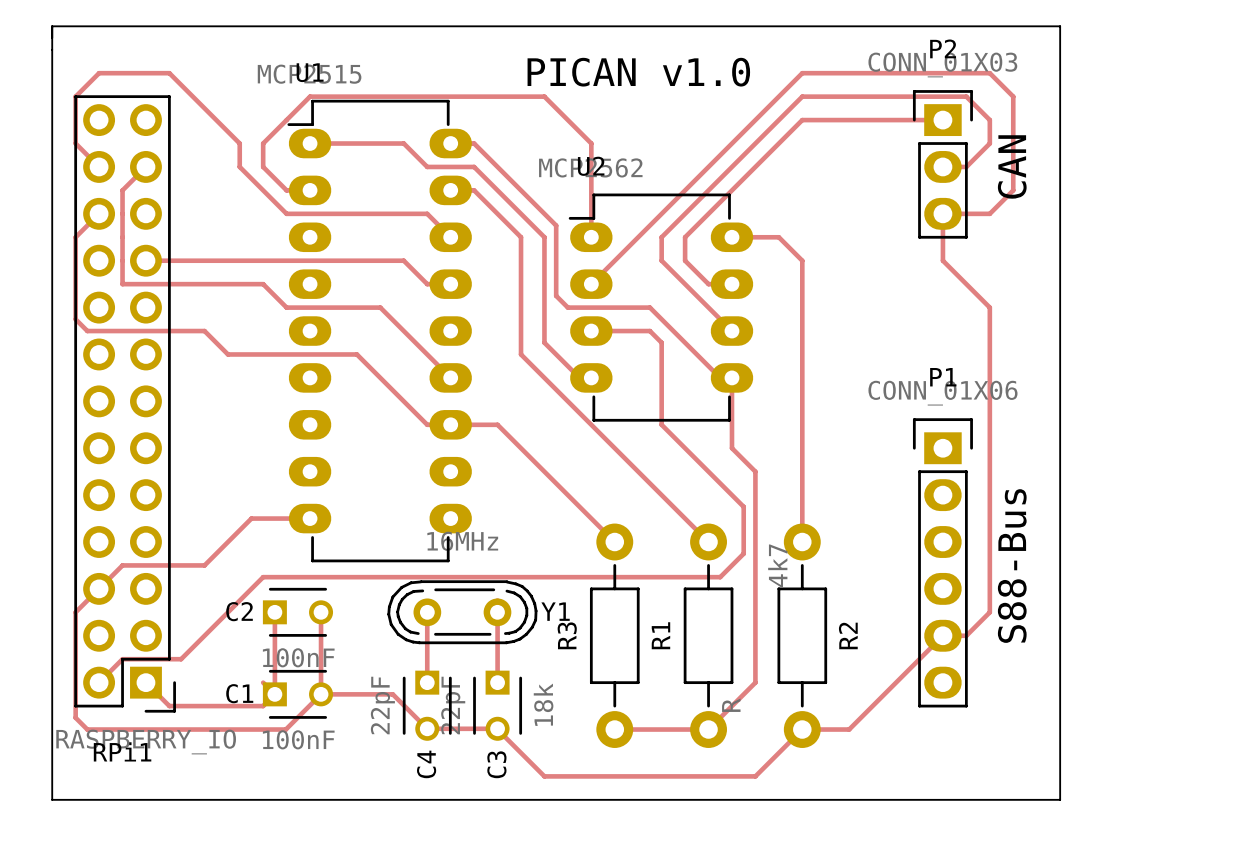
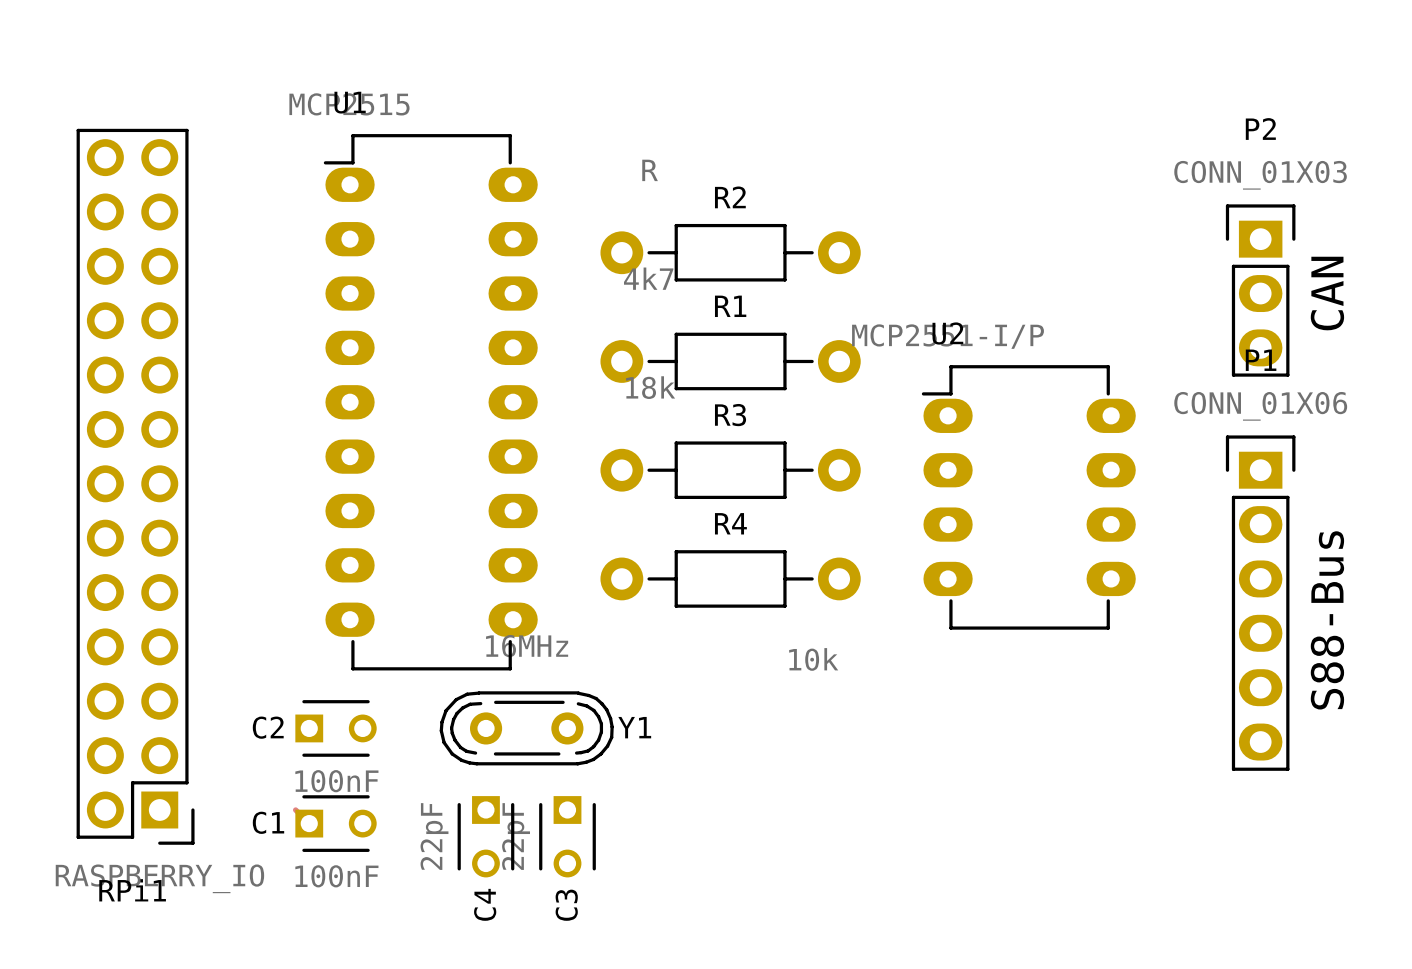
board edge: (52, 26) (52, 799) (1060, 799) (1060, 26) (52, 26) -> none
P2 name position: P2 (943, 48) -> P2 (1260, 129)
text: PICAN v1.0 (638, 72) -> none
track: (942, 120) (802, 120) (685, 237) (685, 260) (708, 284) (731, 284) -> none
track: (310, 143) (403, 143) (427, 166) (474, 166) (544, 237) (544, 342) (579, 377) (591, 377) -> none
track: (450, 143) (474, 143) (556, 225) (556, 295) (567, 307) (649, 307) (720, 377) (731, 377) (731, 448) (755, 471) (755, 682) (708, 729) (614, 729) -> none
P2 position: (942, 164) -> (1260, 290)
track: (99, 166) (75, 143) (75, 96) (99, 73) (169, 73) (239, 143) (239, 166) (286, 213) (427, 213) (450, 237) -> none
track: (145, 166) (122, 190) (122, 284) (263, 284) (286, 307) (380, 307) (450, 377) -> none
track: (942, 166) (966, 166) (989, 143) (989, 120) (966, 96) (802, 96) (661, 237) (661, 260) (731, 331) -> none
text position: CAN (1012, 166) -> CAN (1327, 293)
U2 value: MCP2562 (590, 167) -> MCP2551-I/P (948, 336)
track: (310, 190) (286, 190) (263, 166) (263, 143) (310, 96) (544, 96) (591, 143) (591, 237) -> none
track: (450, 190) (474, 190) (521, 237) (521, 354) (708, 542) -> none
track: (99, 213) (75, 237) (75, 319) (87, 331) (204, 331) (228, 354) (356, 354) (427, 424) (497, 424) (614, 542) -> none
track: (731, 237) (778, 237) (802, 260) (802, 542) -> none
track: (145, 260) (403, 260) (427, 284) (450, 284) -> none
track: (591, 284) (802, 73) (989, 73) (1013, 96) (1013, 190) (989, 213) (942, 213) (942, 260) (989, 307) (989, 612) (966, 635) (942, 635) (849, 729) (802, 729) (755, 776) (544, 776) (497, 728) (427, 728) (392, 694) (321, 694) -> none
U2 position: (660, 307) -> (1028, 497)
track: (591, 331) (649, 331) (661, 342) (661, 424) (743, 506) (743, 553) (720, 577) (263, 577) (181, 659) (122, 659) (99, 682) -> none
P1 name position: P1 (943, 377) -> P1 (1261, 360)
R4: none -> 10k (730, 578)
track: (310, 518) (251, 518) (204, 565) (122, 565) (75, 612) (75, 717) (87, 729) (285, 729) (321, 694) -> none
P1 position: (942, 562) -> (1260, 603)
R1 value position: 4k7 (777, 565) -> 4k7 (648, 278)
text position: S88-Bus (1012, 566) -> S88-Bus (1327, 620)
track: (274, 612) (274, 694) (263, 706) (169, 706) (145, 682) -> none
track: (321, 612) (321, 694) -> none
track: (427, 612) (427, 682) -> none
track: (497, 612) (497, 682) -> none
R3 rotation: 0° (614, 635) -> 90° clockwise (730, 470)
R3 position: (614, 635) -> (730, 470)
R1 rotation: 0° (708, 635) -> 90° clockwise (730, 361)
R1 position: (708, 635) -> (730, 361)
R2 rotation: 0° (802, 635) -> 90° clockwise (730, 252)
R2 position: (802, 635) -> (730, 252)
R2 name position: R2 (848, 635) -> R2 (730, 197)

